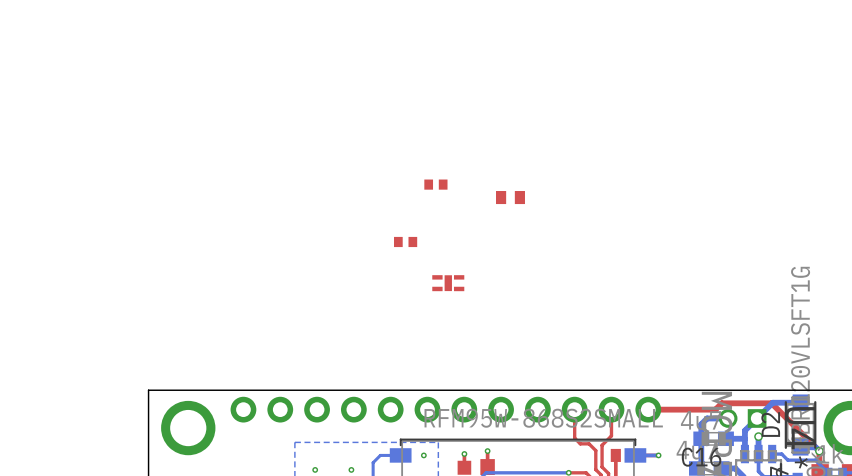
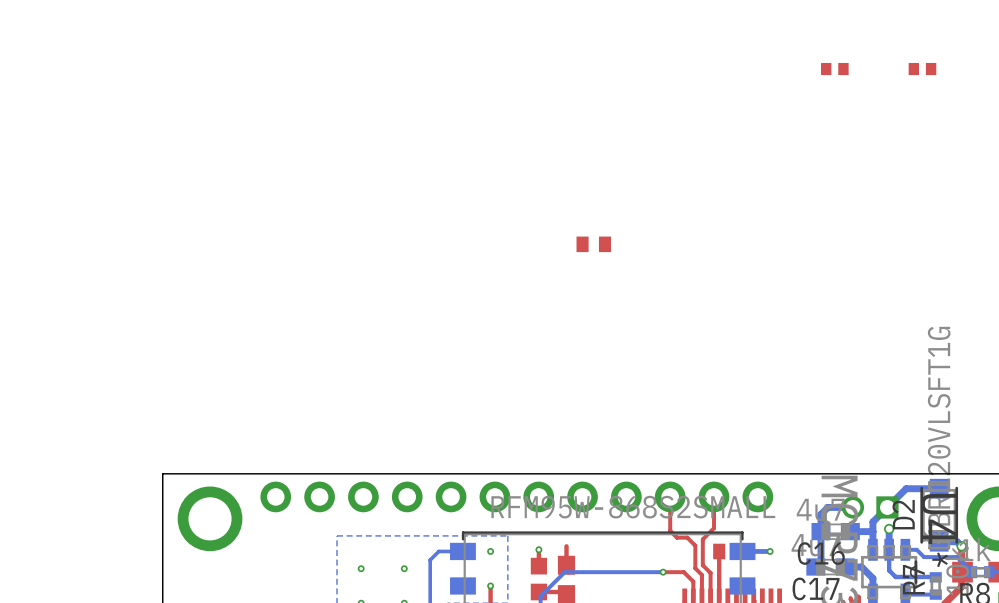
part: none -> (834, 69)
part: none -> (922, 69)
part: (435, 184) -> none
part: (405, 241) -> none
part: (448, 283) -> none
top track: (648, 409) (715, 409) (721, 403) (771, 403) (819, 451) -> none
via: (487, 451) -> none

